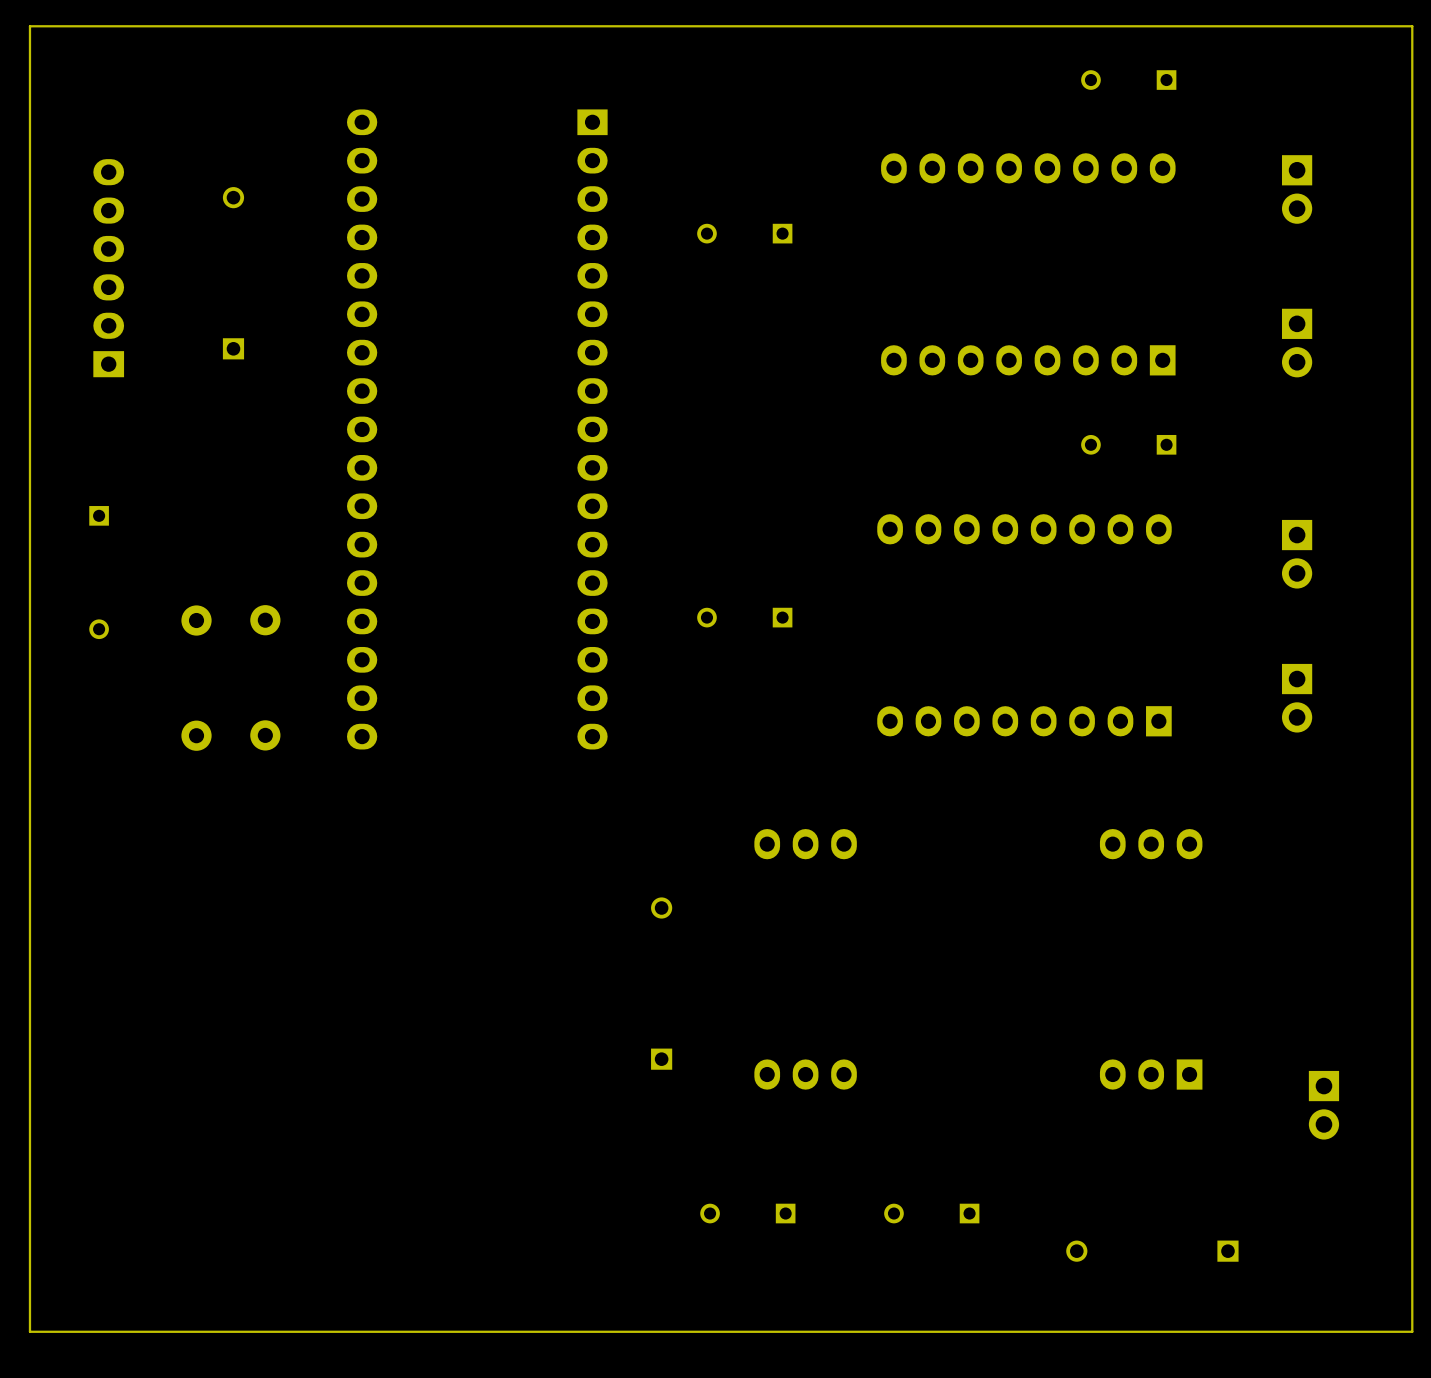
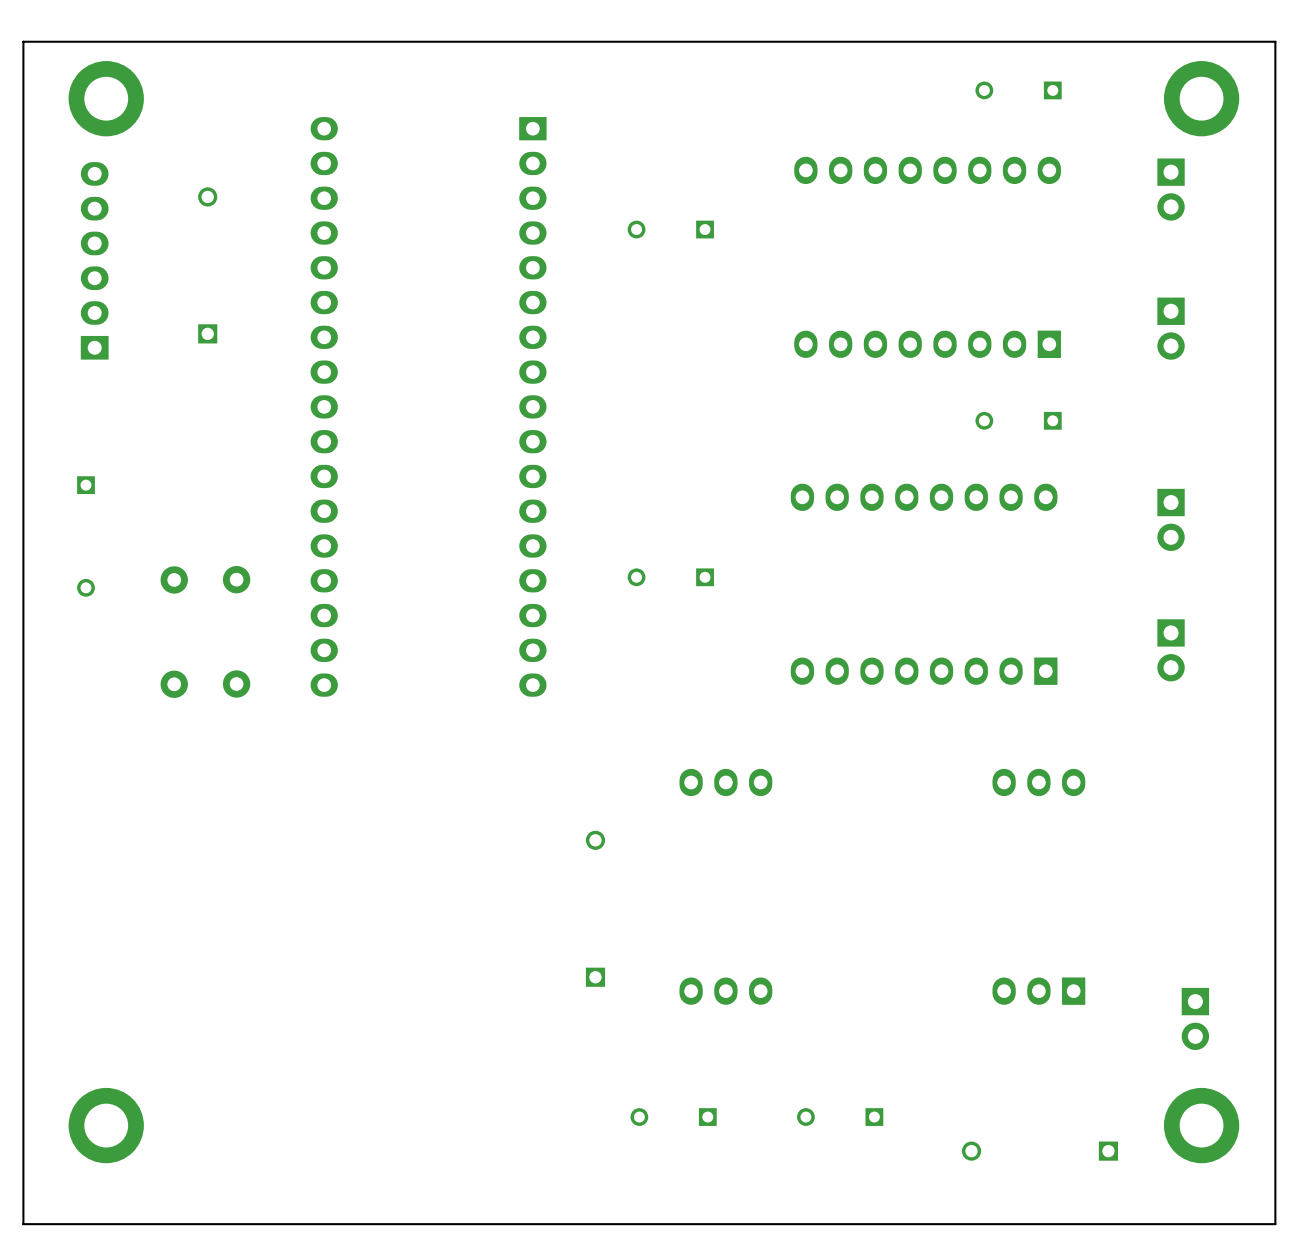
part: none -> (106, 98)
part: none -> (1201, 98)
part: none -> (106, 1125)
part: none -> (1201, 1125)

